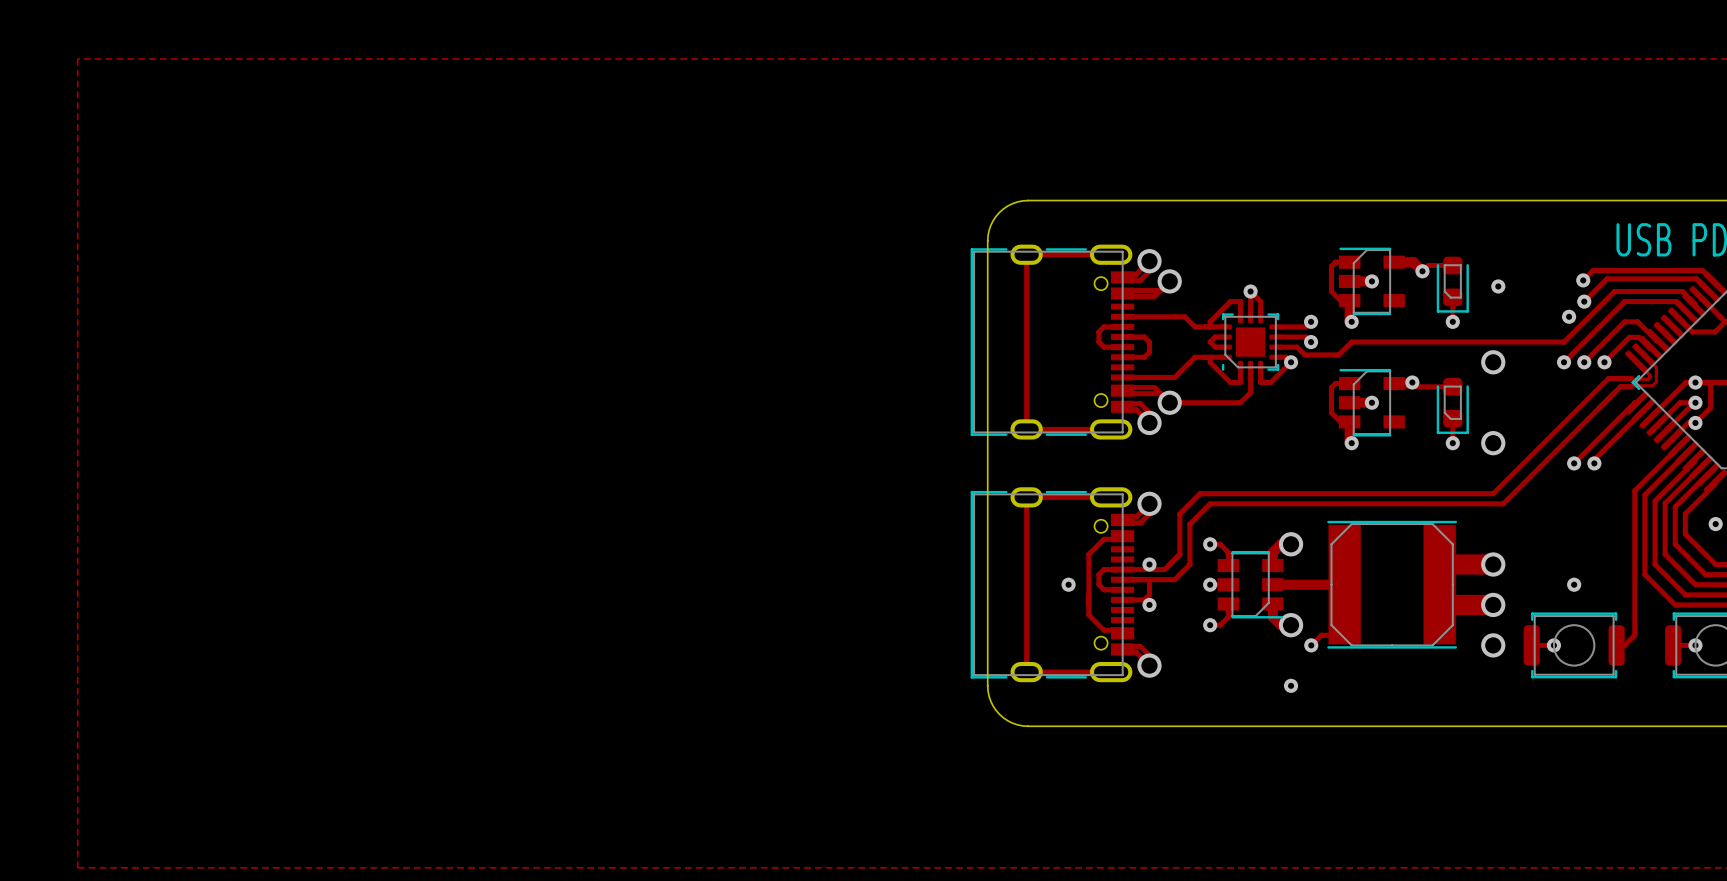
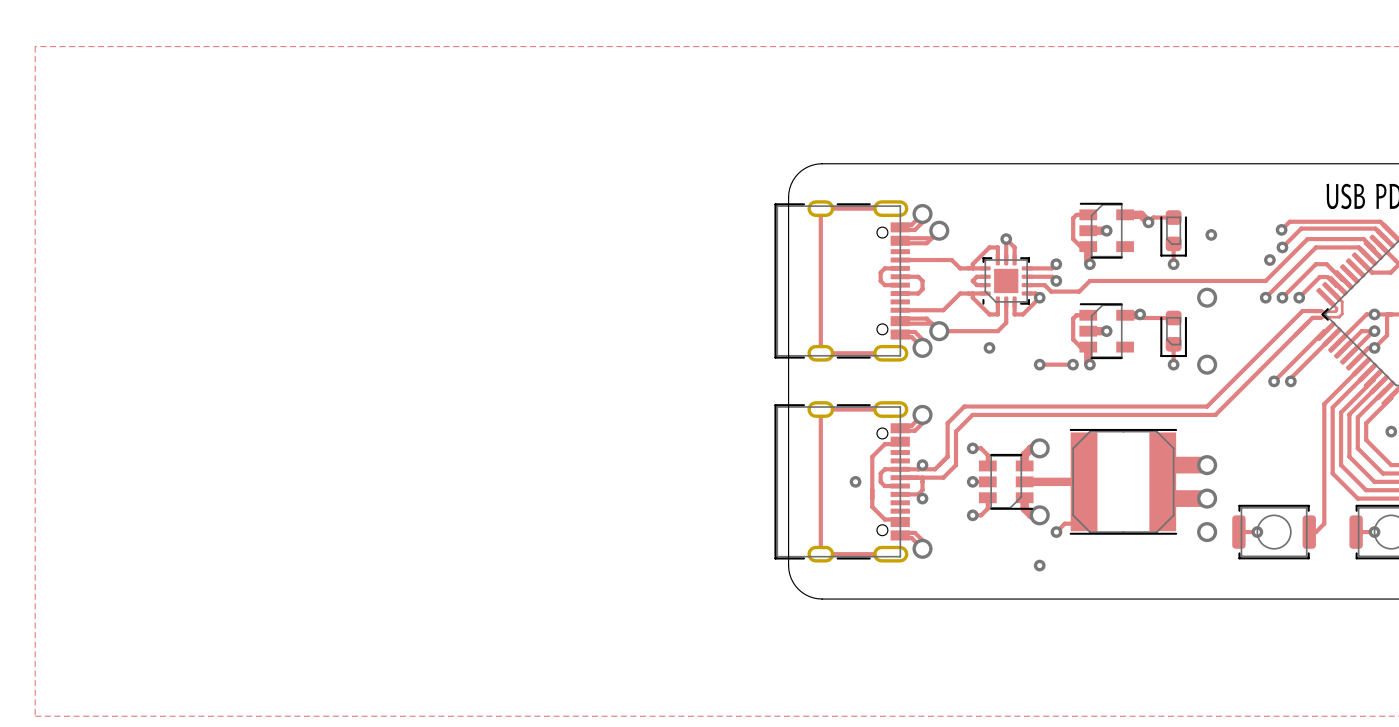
via: none -> (989, 347)
track: none -> (1039, 364) (1073, 364)
via: none -> (1039, 364)
via: none -> (1073, 364)
via: (1574, 584) -> none

